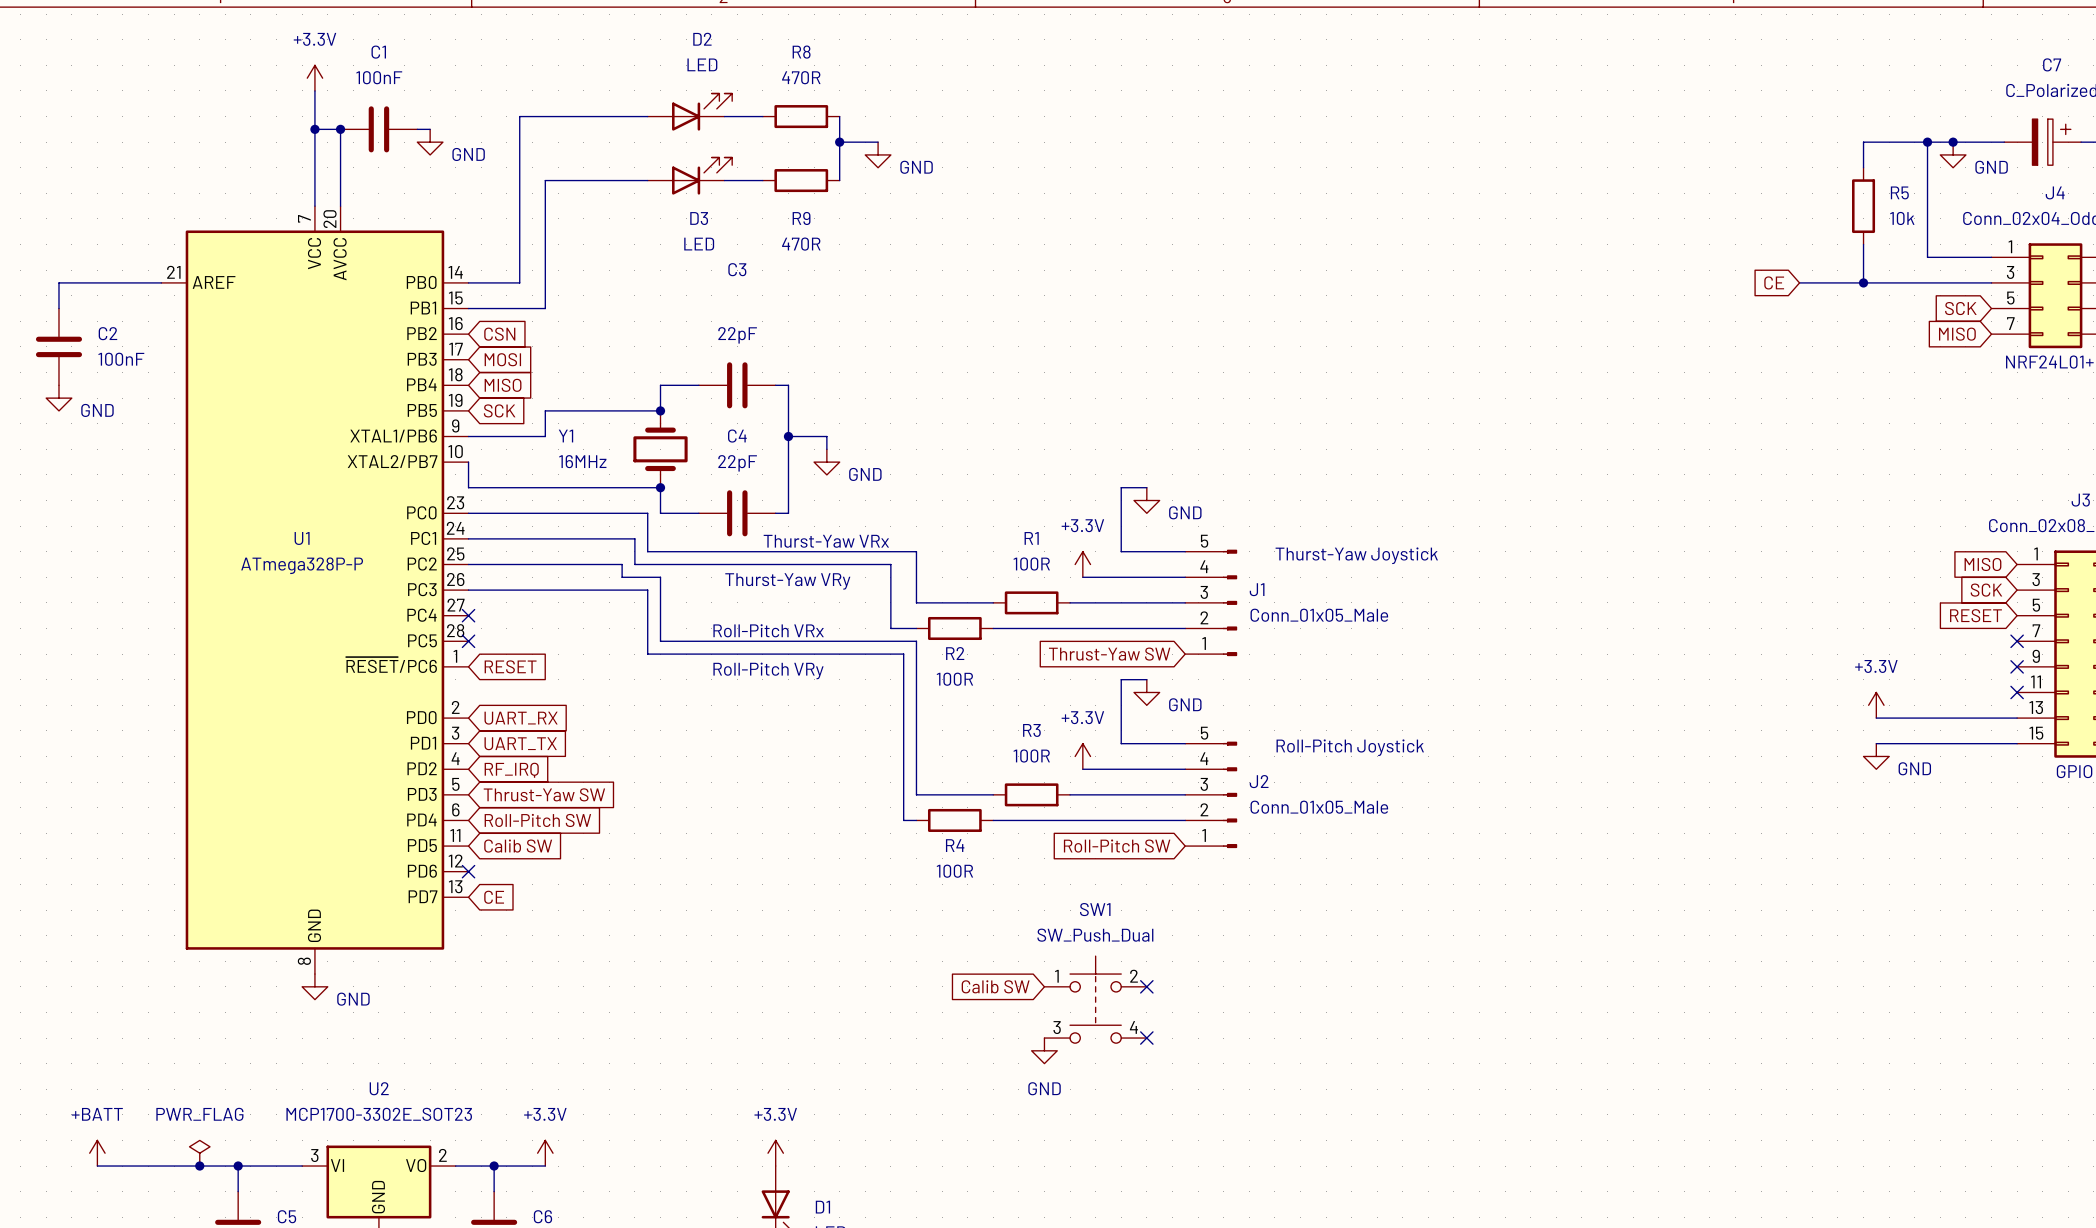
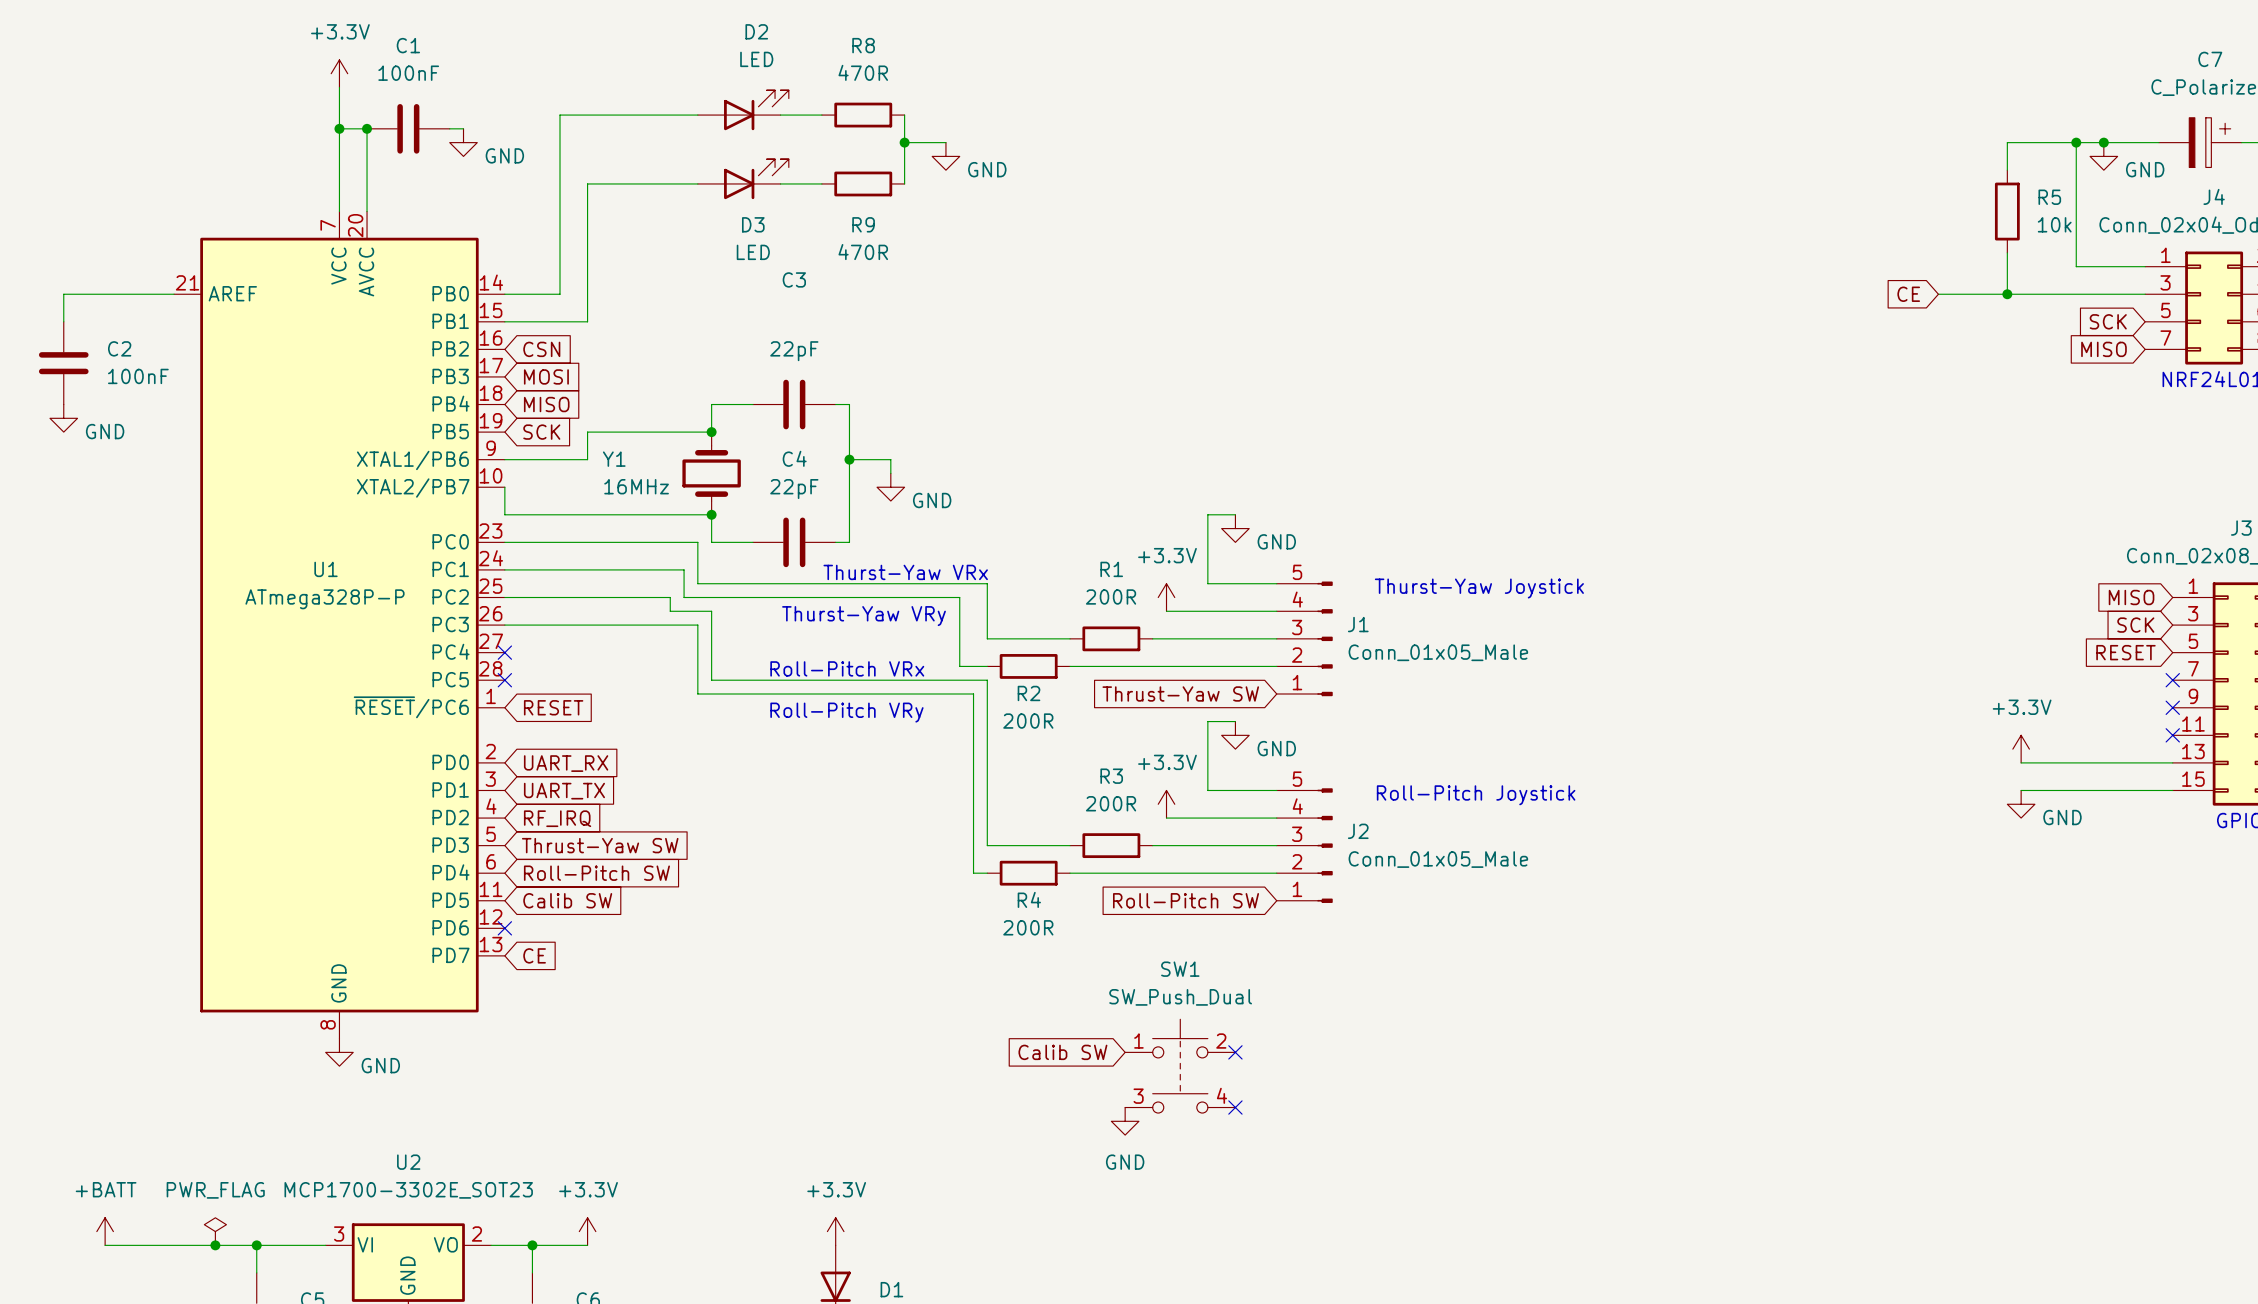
R1 value: 100R (1031, 564) -> 200R (1111, 596)
R2 value: 100R (954, 679) -> 200R (1028, 721)
R3 value: 100R (1031, 756) -> 200R (1111, 803)
R4 value: 100R (954, 871) -> 200R (1028, 927)

